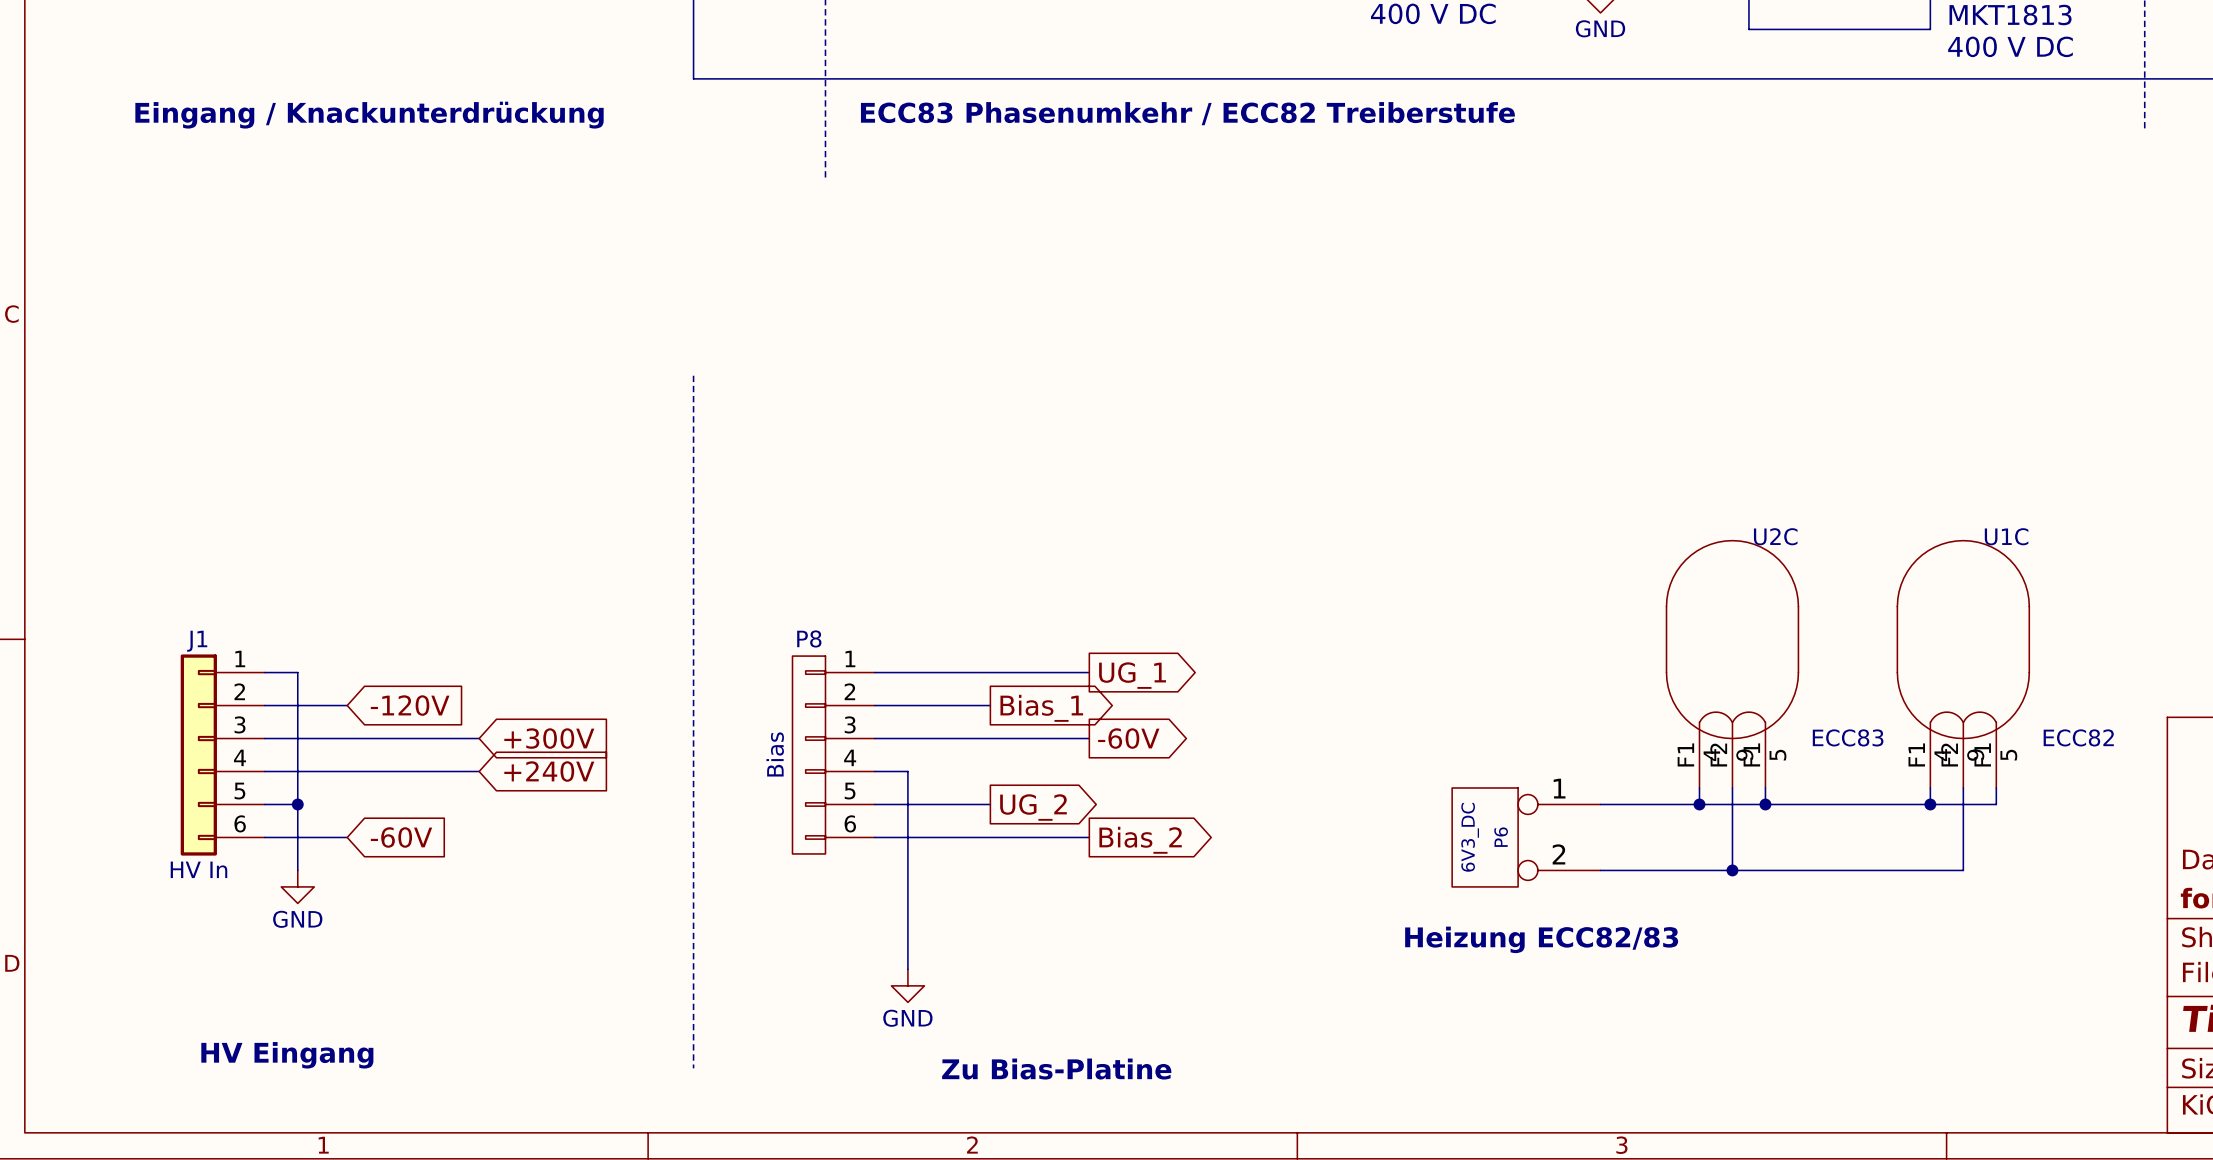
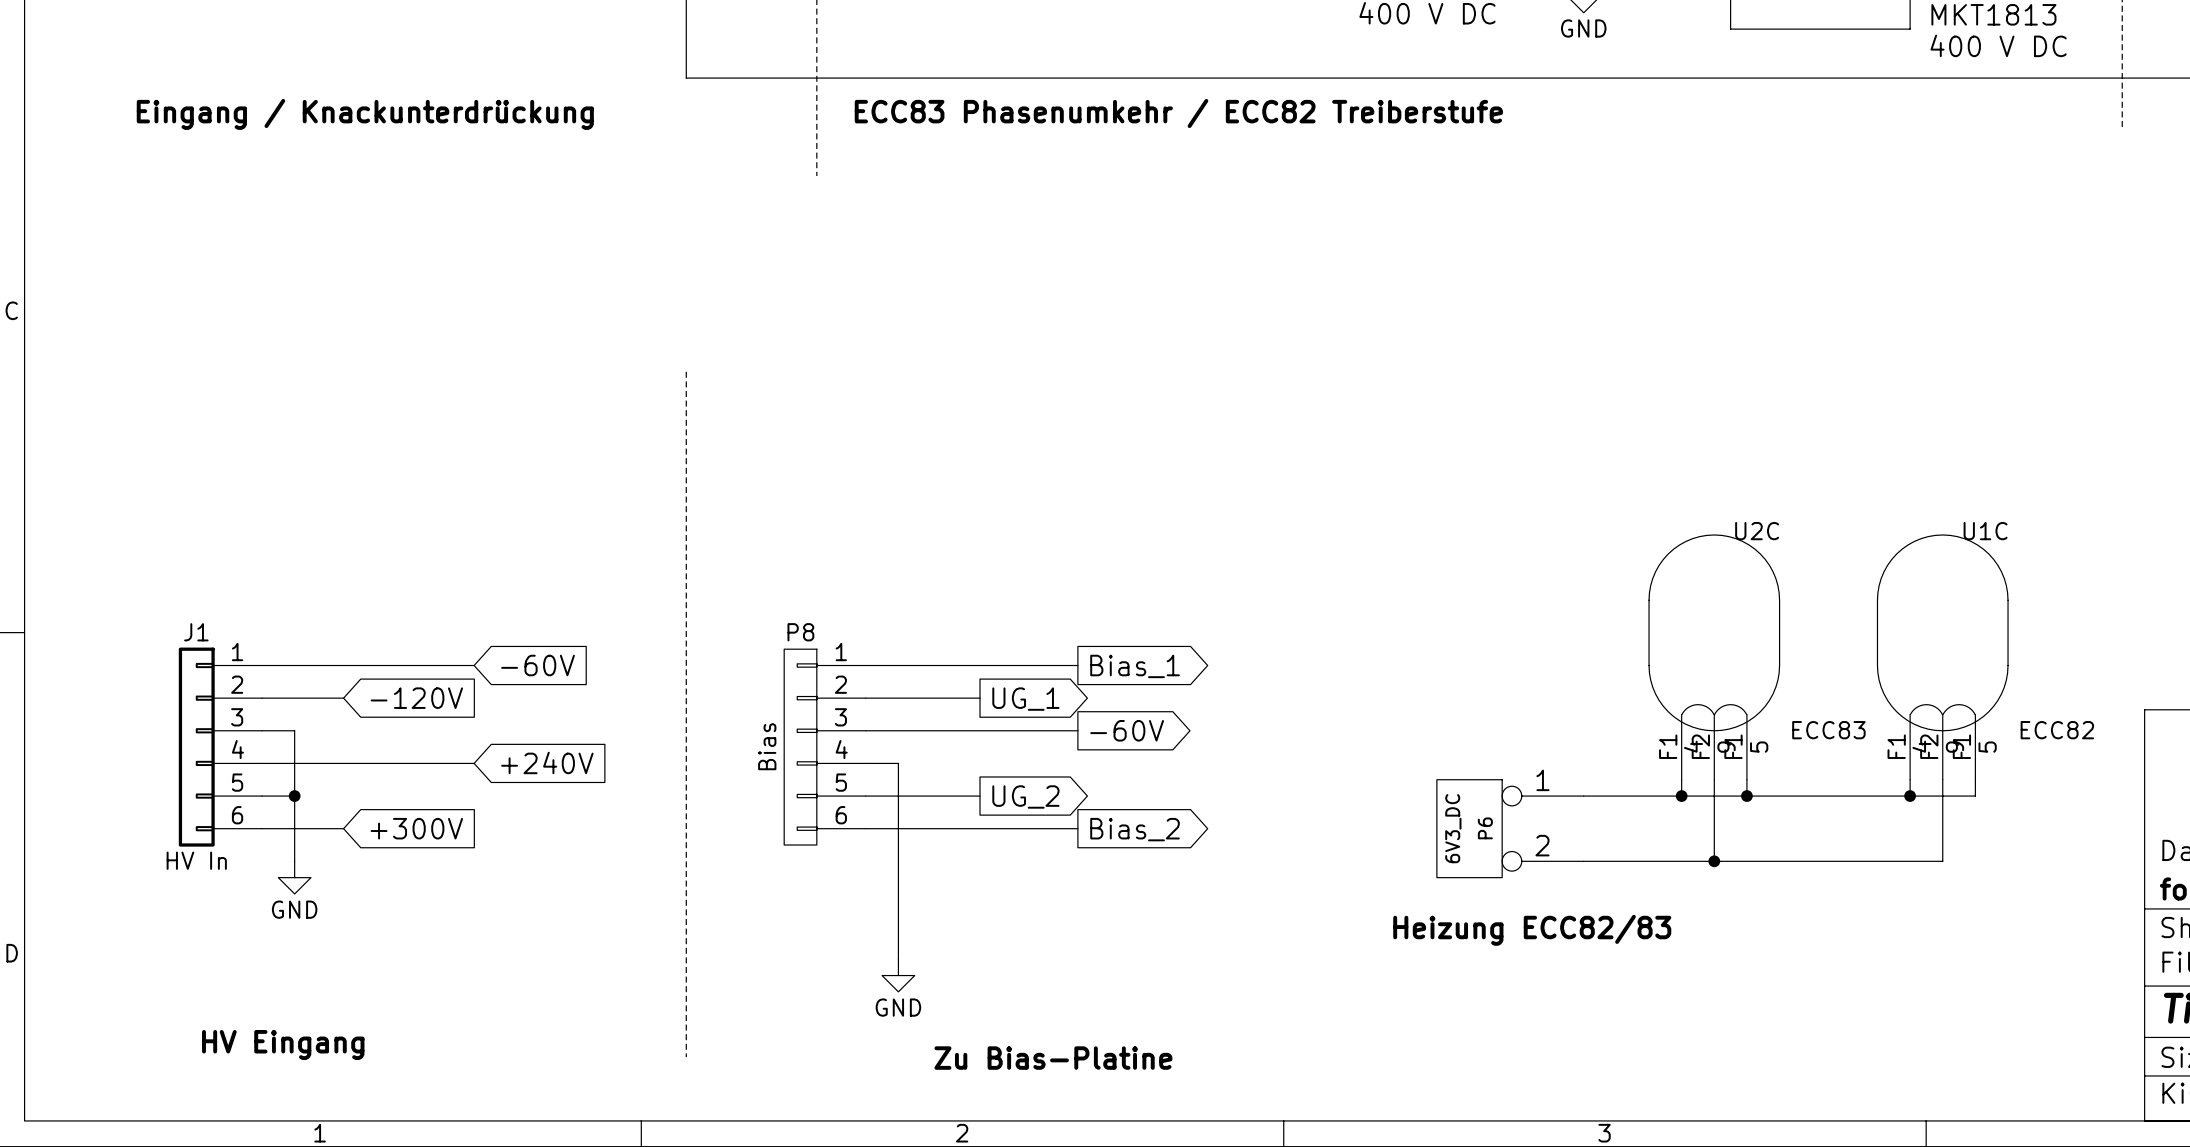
wire: (297, 672) (297, 738) (479, 738) -> (294, 665) (474, 665)
global label: none -> -60V (538, 665)
global label: UG_1 (1132, 675) -> Bias_1 (1135, 666)
global label: Bias_1 (1041, 708) -> UG_1 (1025, 699)
global label: +300V (549, 738) -> none
global label: -60V (401, 837) -> +300V (416, 828)

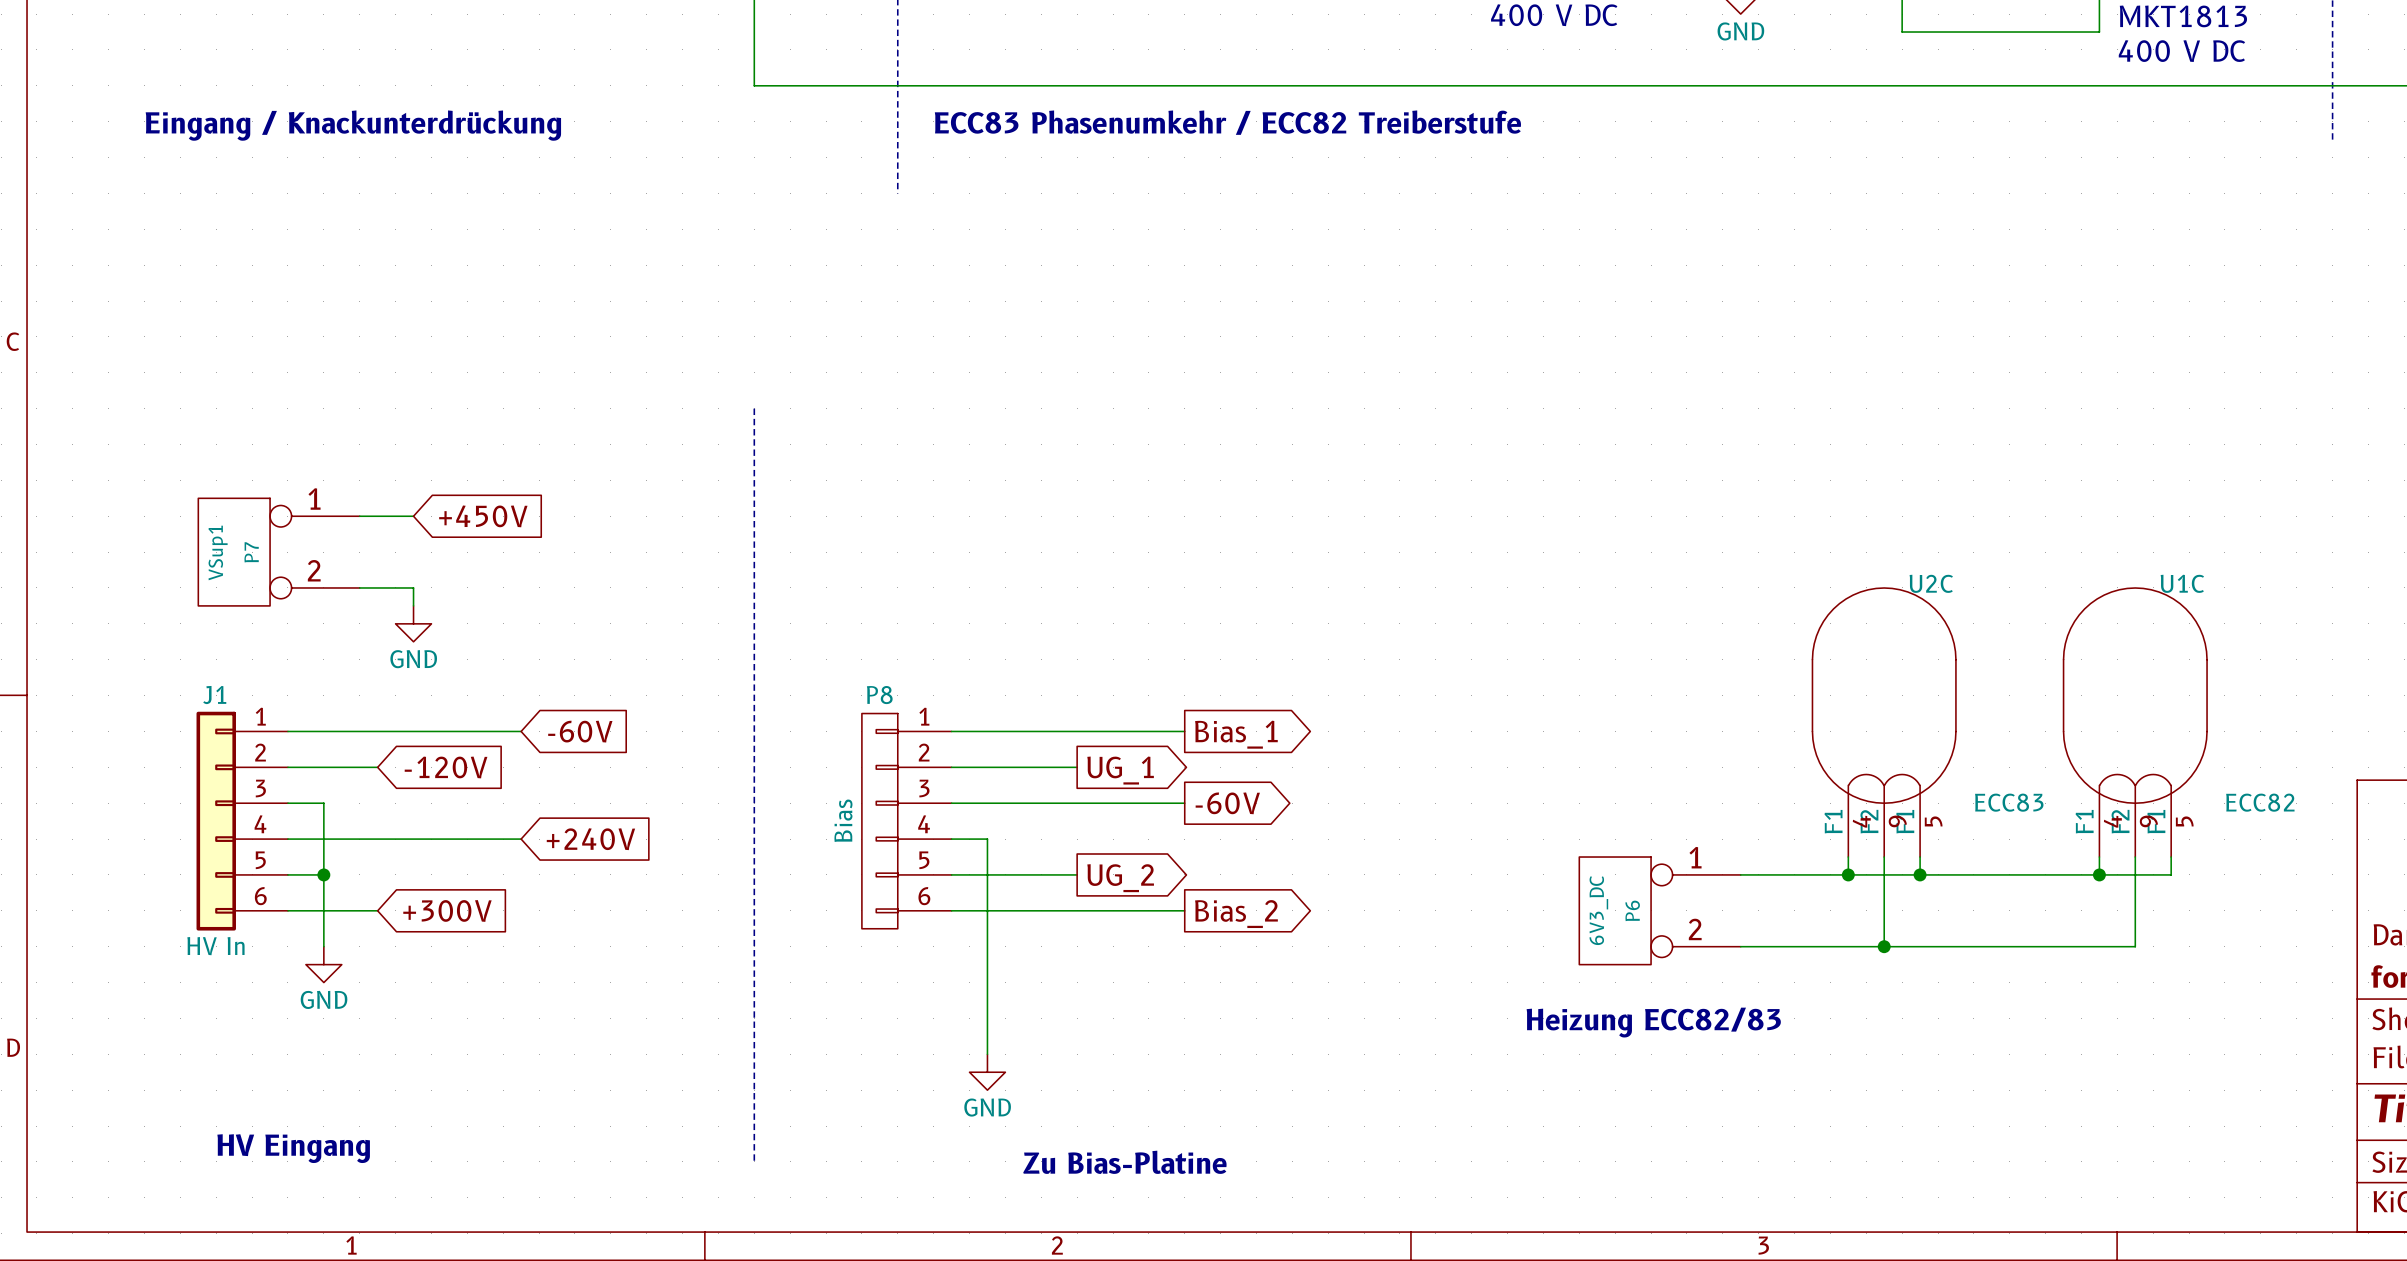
wire: none -> (359, 516) (413, 516)
global label: none -> +450V (483, 516)
P7: none -> VSup1 (279, 552)
wire: none -> (359, 587) (413, 587) (413, 605)
power symbol: none -> GND (413, 623)

